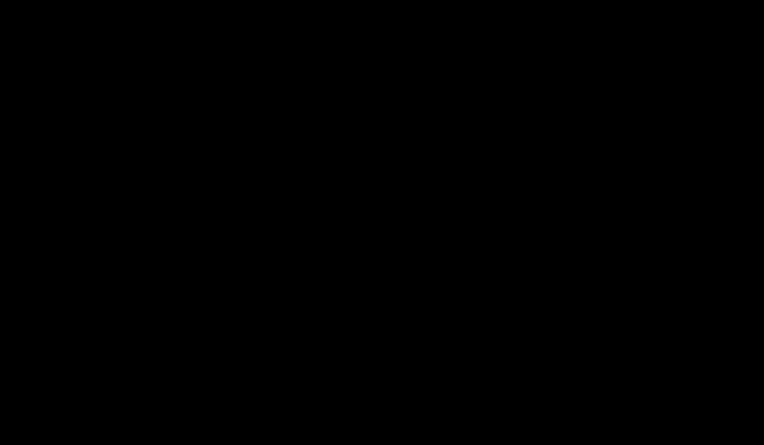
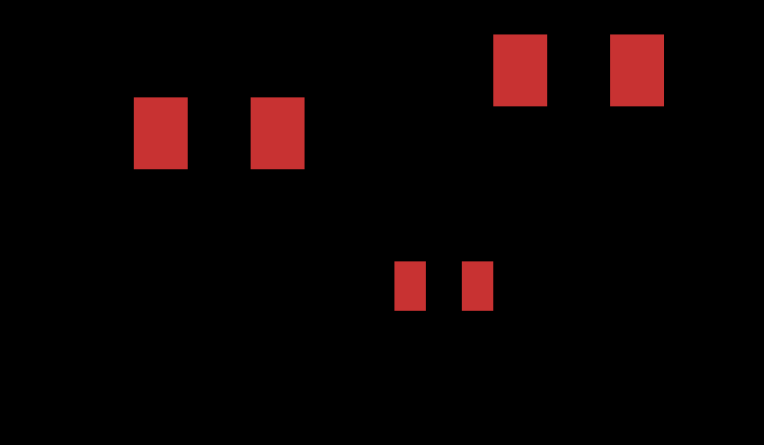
part: none -> (578, 70)
part: none -> (219, 133)
part: none -> (443, 286)

